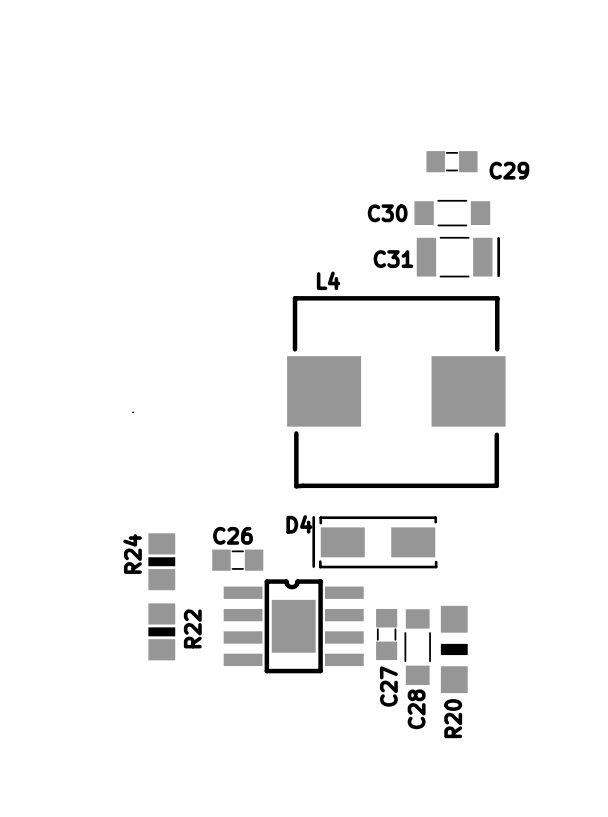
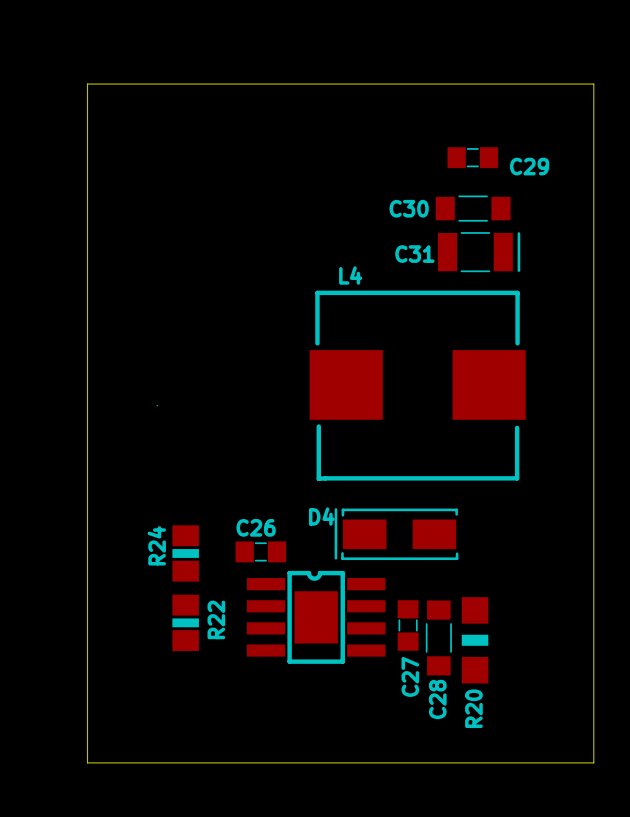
board edge: none -> (87, 84) (593, 84) (593, 762) (87, 762) (87, 84)

